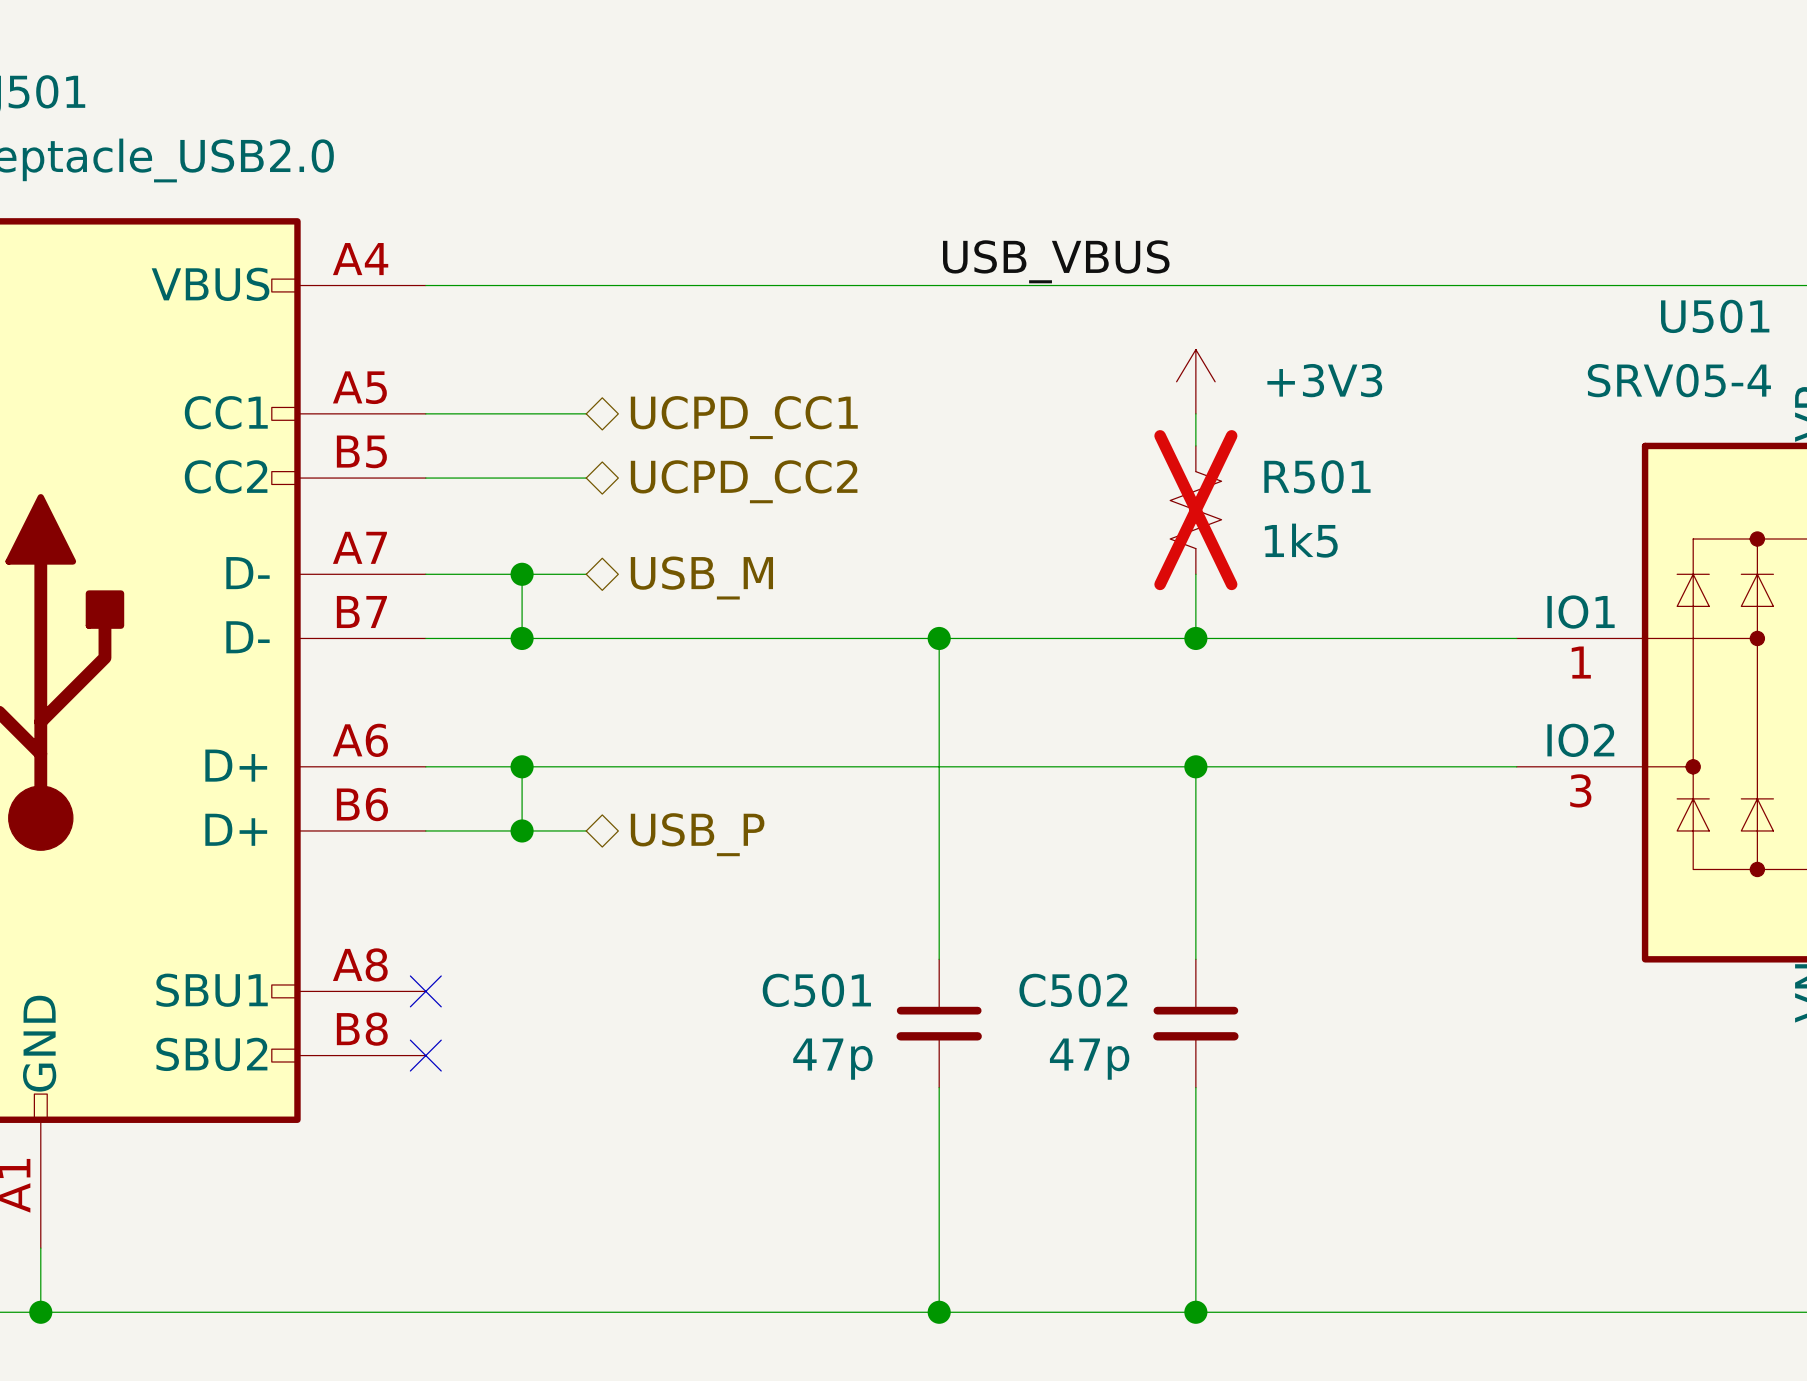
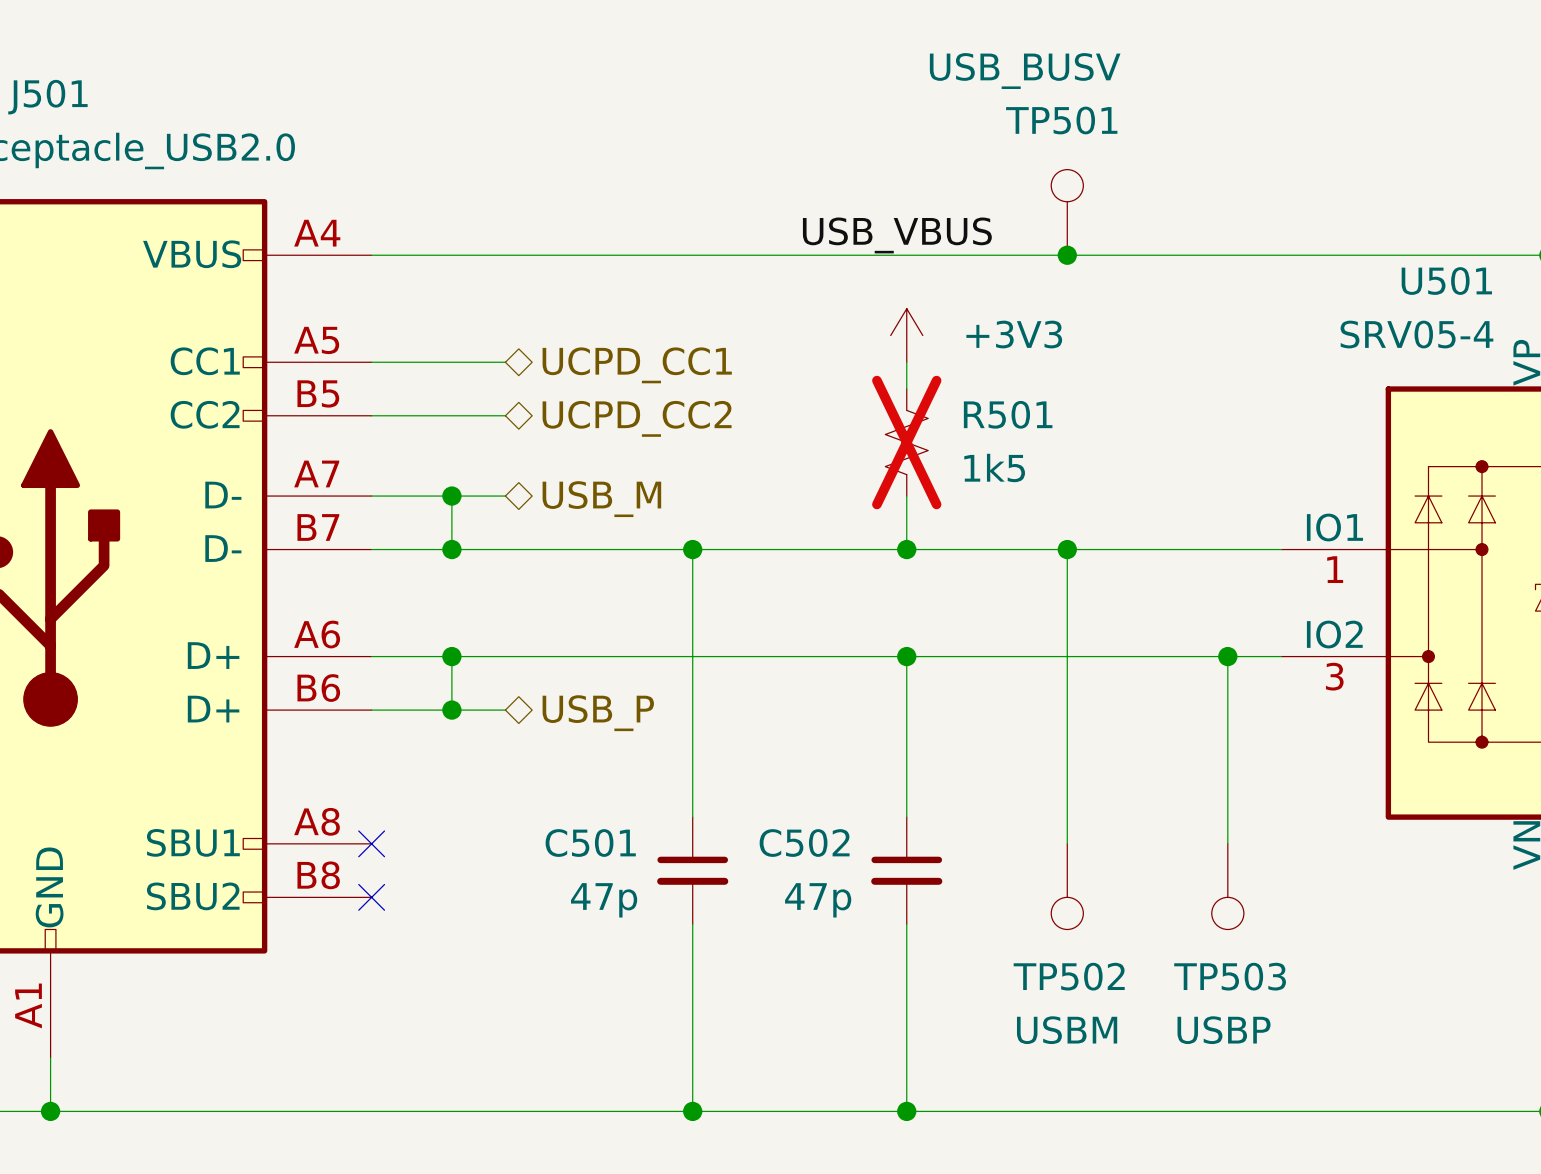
TP501: none -> USB_BUSV (1067, 212)
junction: none -> (1067, 255)
power symbol position: +3V3 (1195, 381) -> +3V3 (906, 335)
wire: (1195, 413) (1195, 445) -> (906, 362) (906, 389)
R501 position: (1195, 510) -> (906, 442)
wire: (1195, 574) (1195, 638) -> (906, 496) (906, 549)
junction: none -> (692, 549)
wire: (939, 638) (939, 959) -> (692, 549) (692, 817)
junction: (939, 638) -> none
junction: none -> (906, 549)
junction: (1195, 638) -> none
wire: none -> (1067, 549) (1067, 843)
junction: none -> (1067, 549)
junction: none -> (906, 656)
wire: (1195, 766) (1195, 959) -> (906, 656) (906, 817)
junction: (1195, 766) -> none
wire: none -> (1227, 656) (1227, 843)
junction: none -> (1227, 656)
C501 position: (939, 1023) -> (692, 870)
C502 position: (1195, 1023) -> (906, 870)
TP502: none -> USBM (1067, 886)
TP503: none -> USBP (1227, 886)
wire: (939, 1087) (939, 1312) -> (692, 924) (692, 1111)
wire: (1195, 1087) (1195, 1312) -> (906, 924) (906, 1111)
junction: none -> (692, 1111)
junction: (939, 1312) -> none
junction: none -> (906, 1111)
junction: (1195, 1312) -> none

